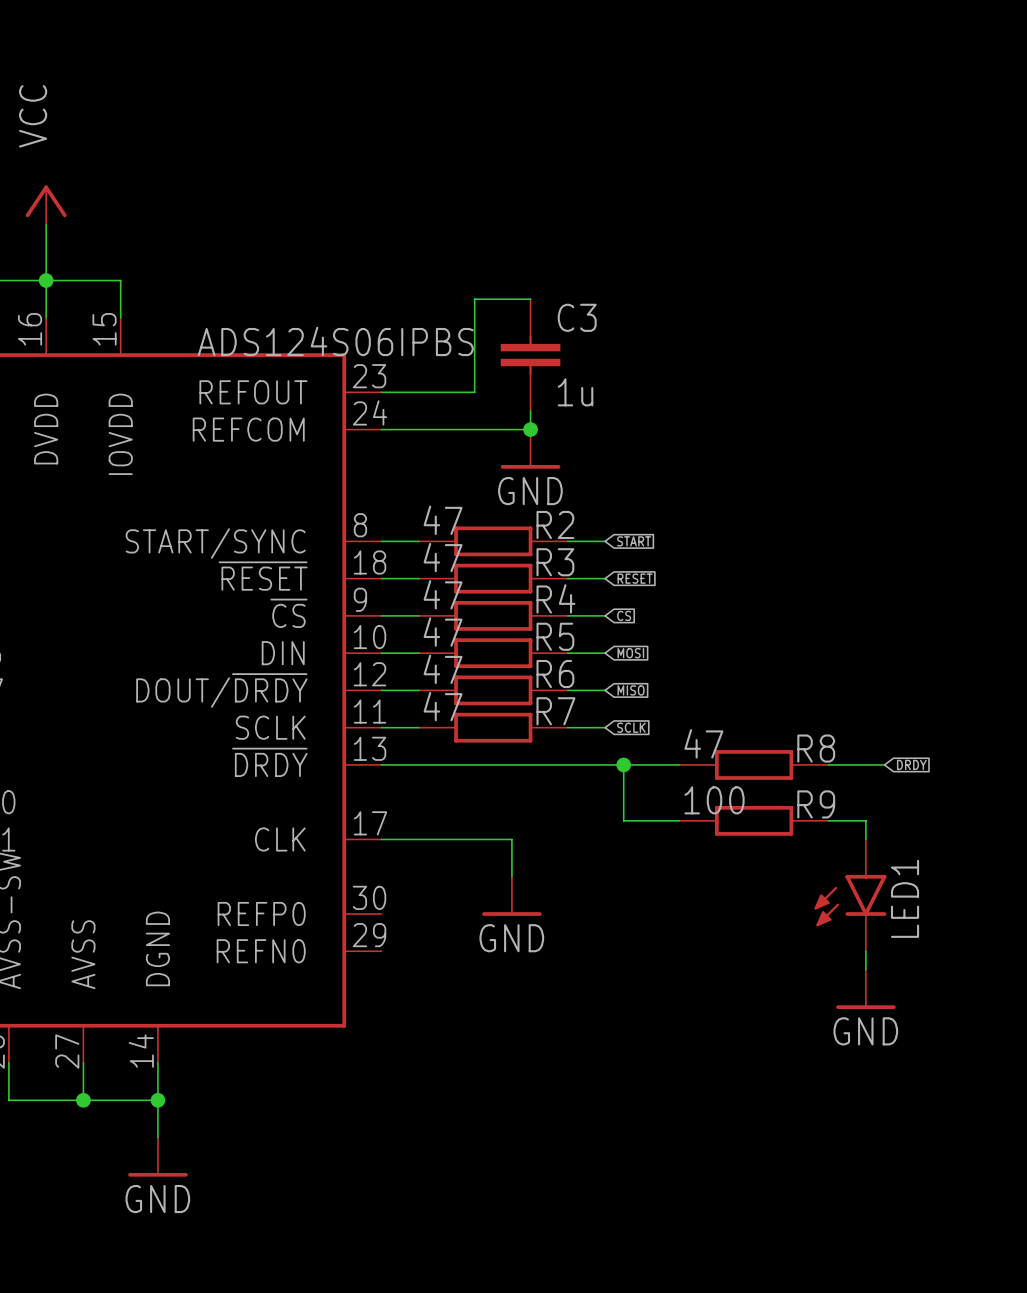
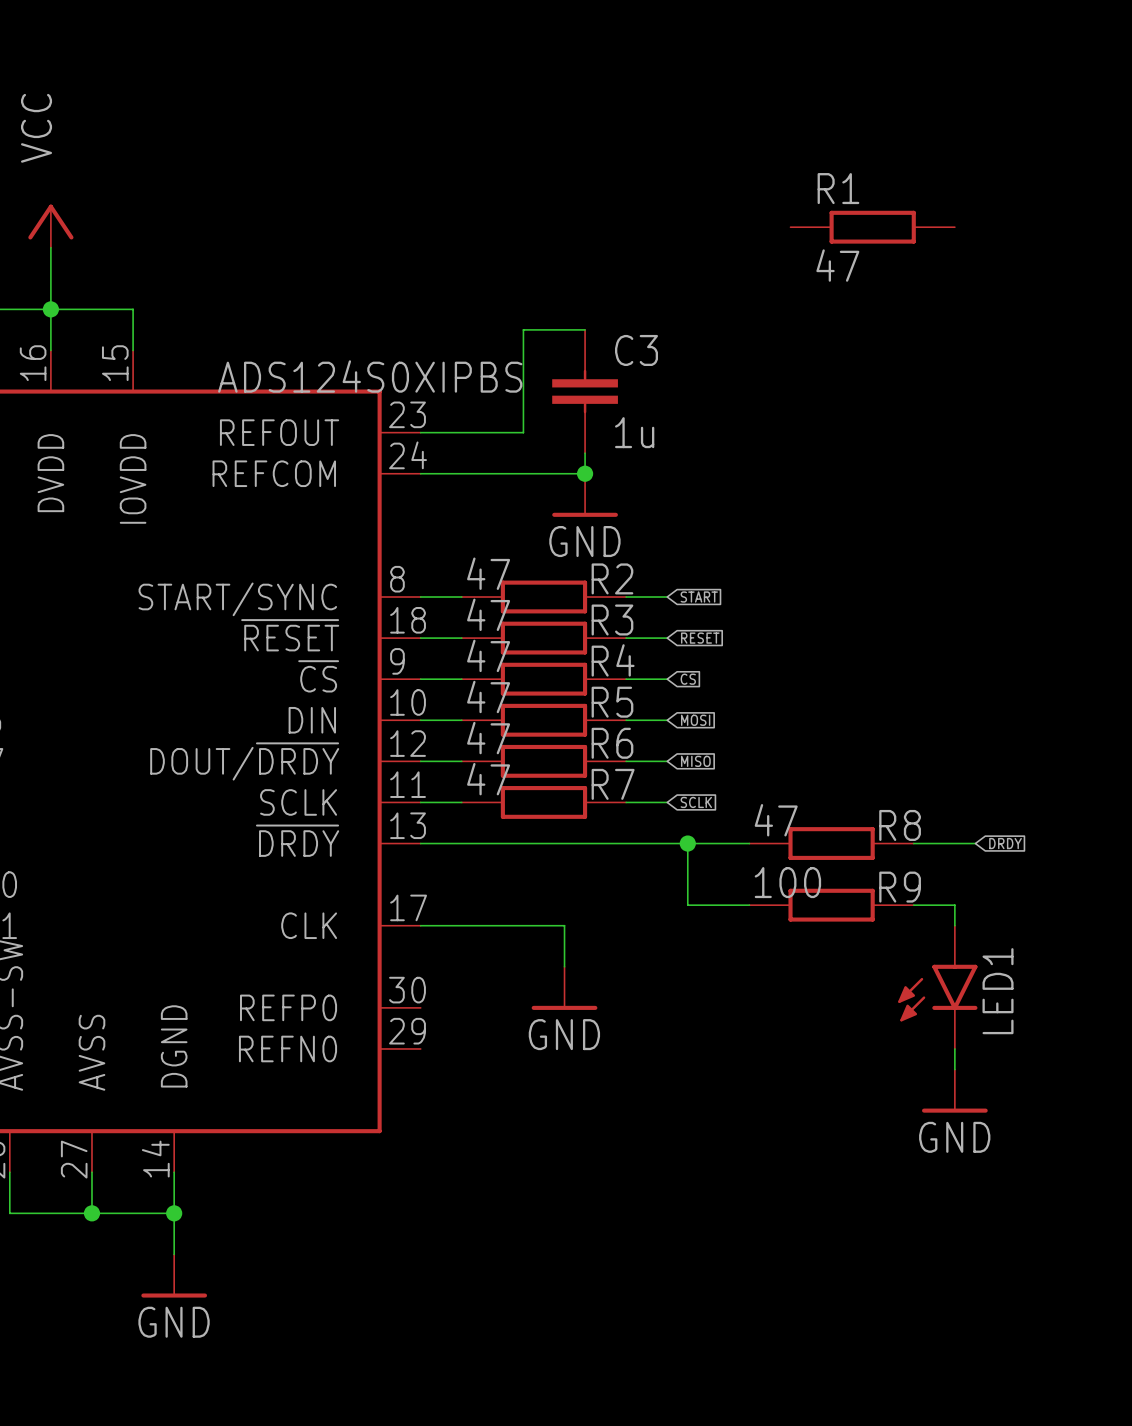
R1: none -> 47 (872, 227)
part value: ADS124S06IPBS (335, 341) -> ADS124S0XIPBS (370, 376)

